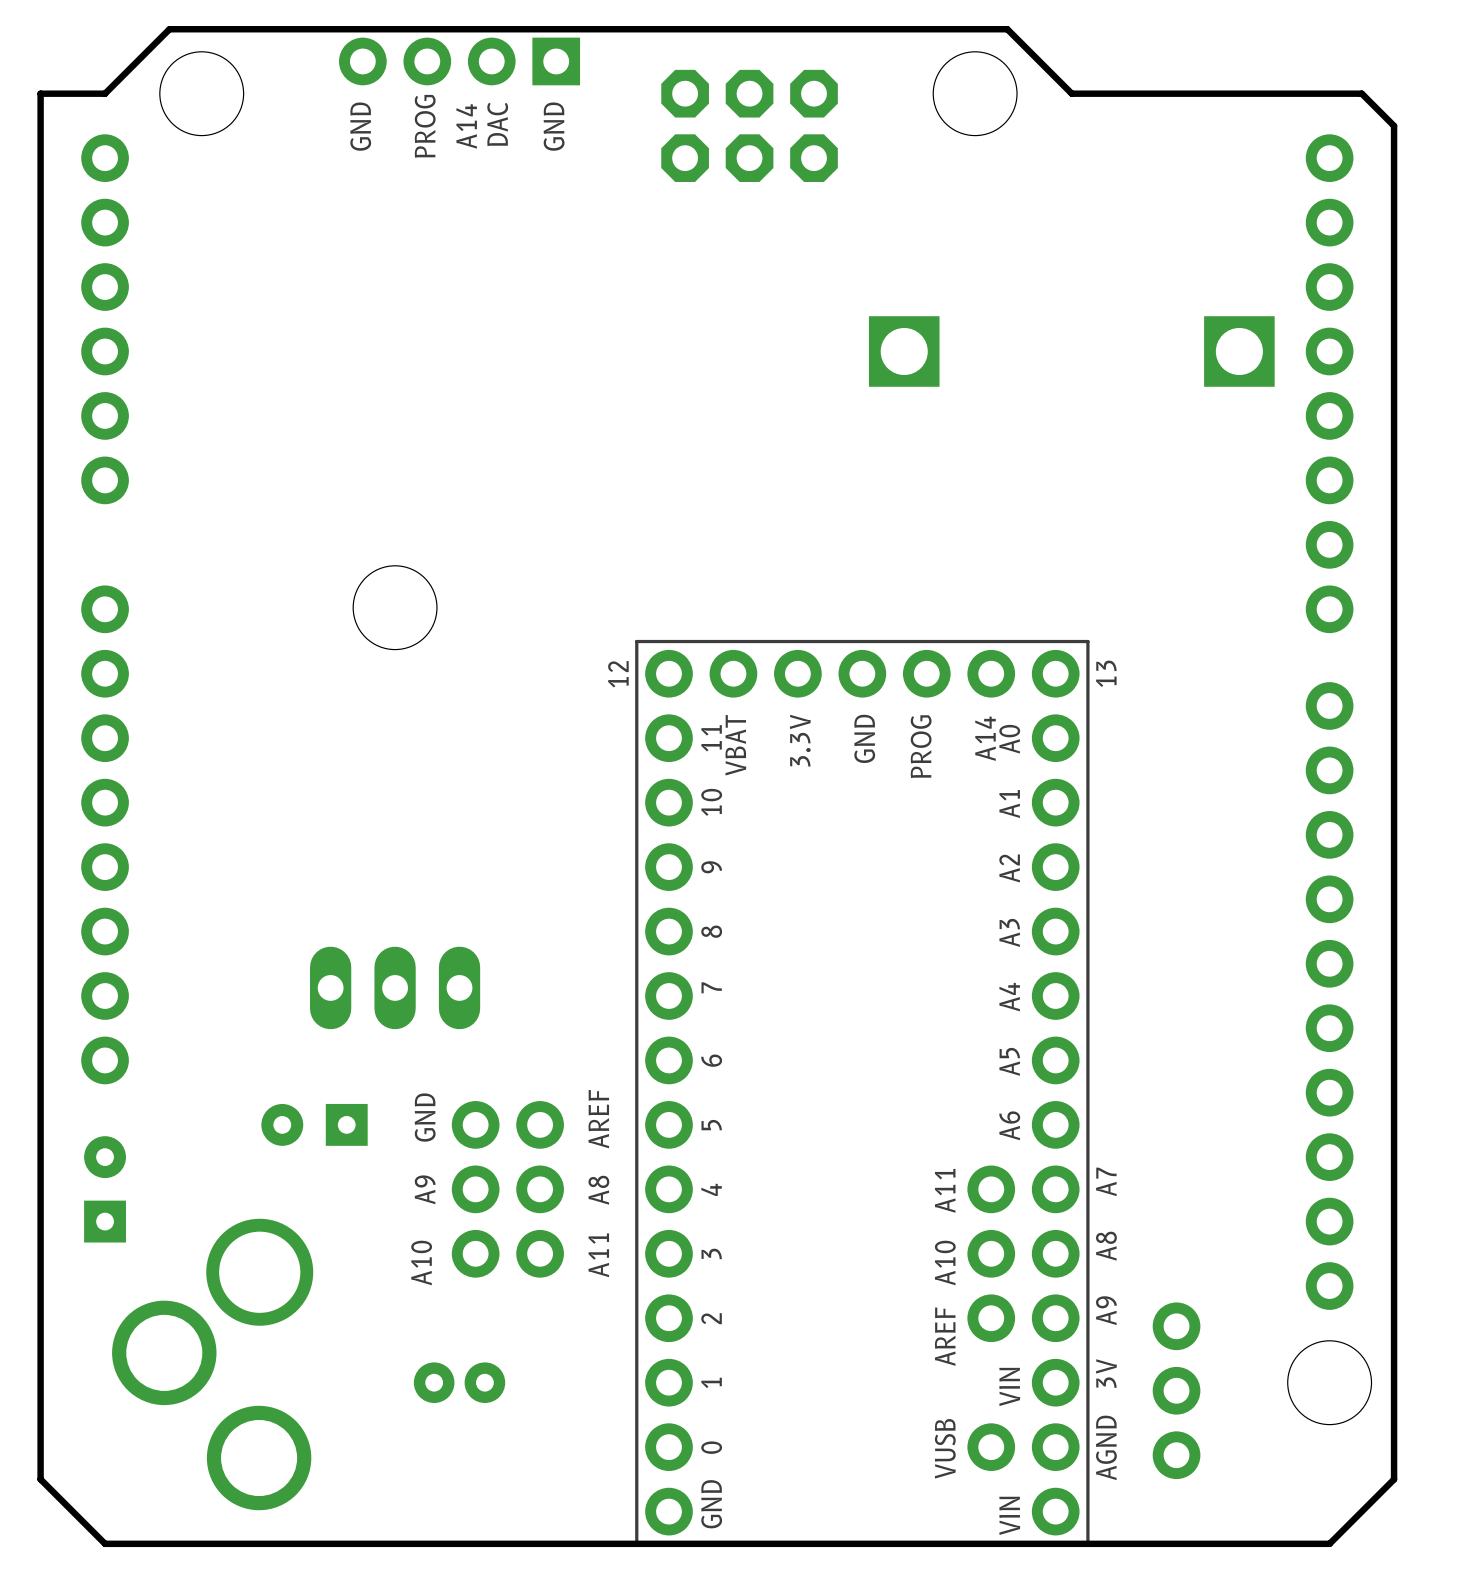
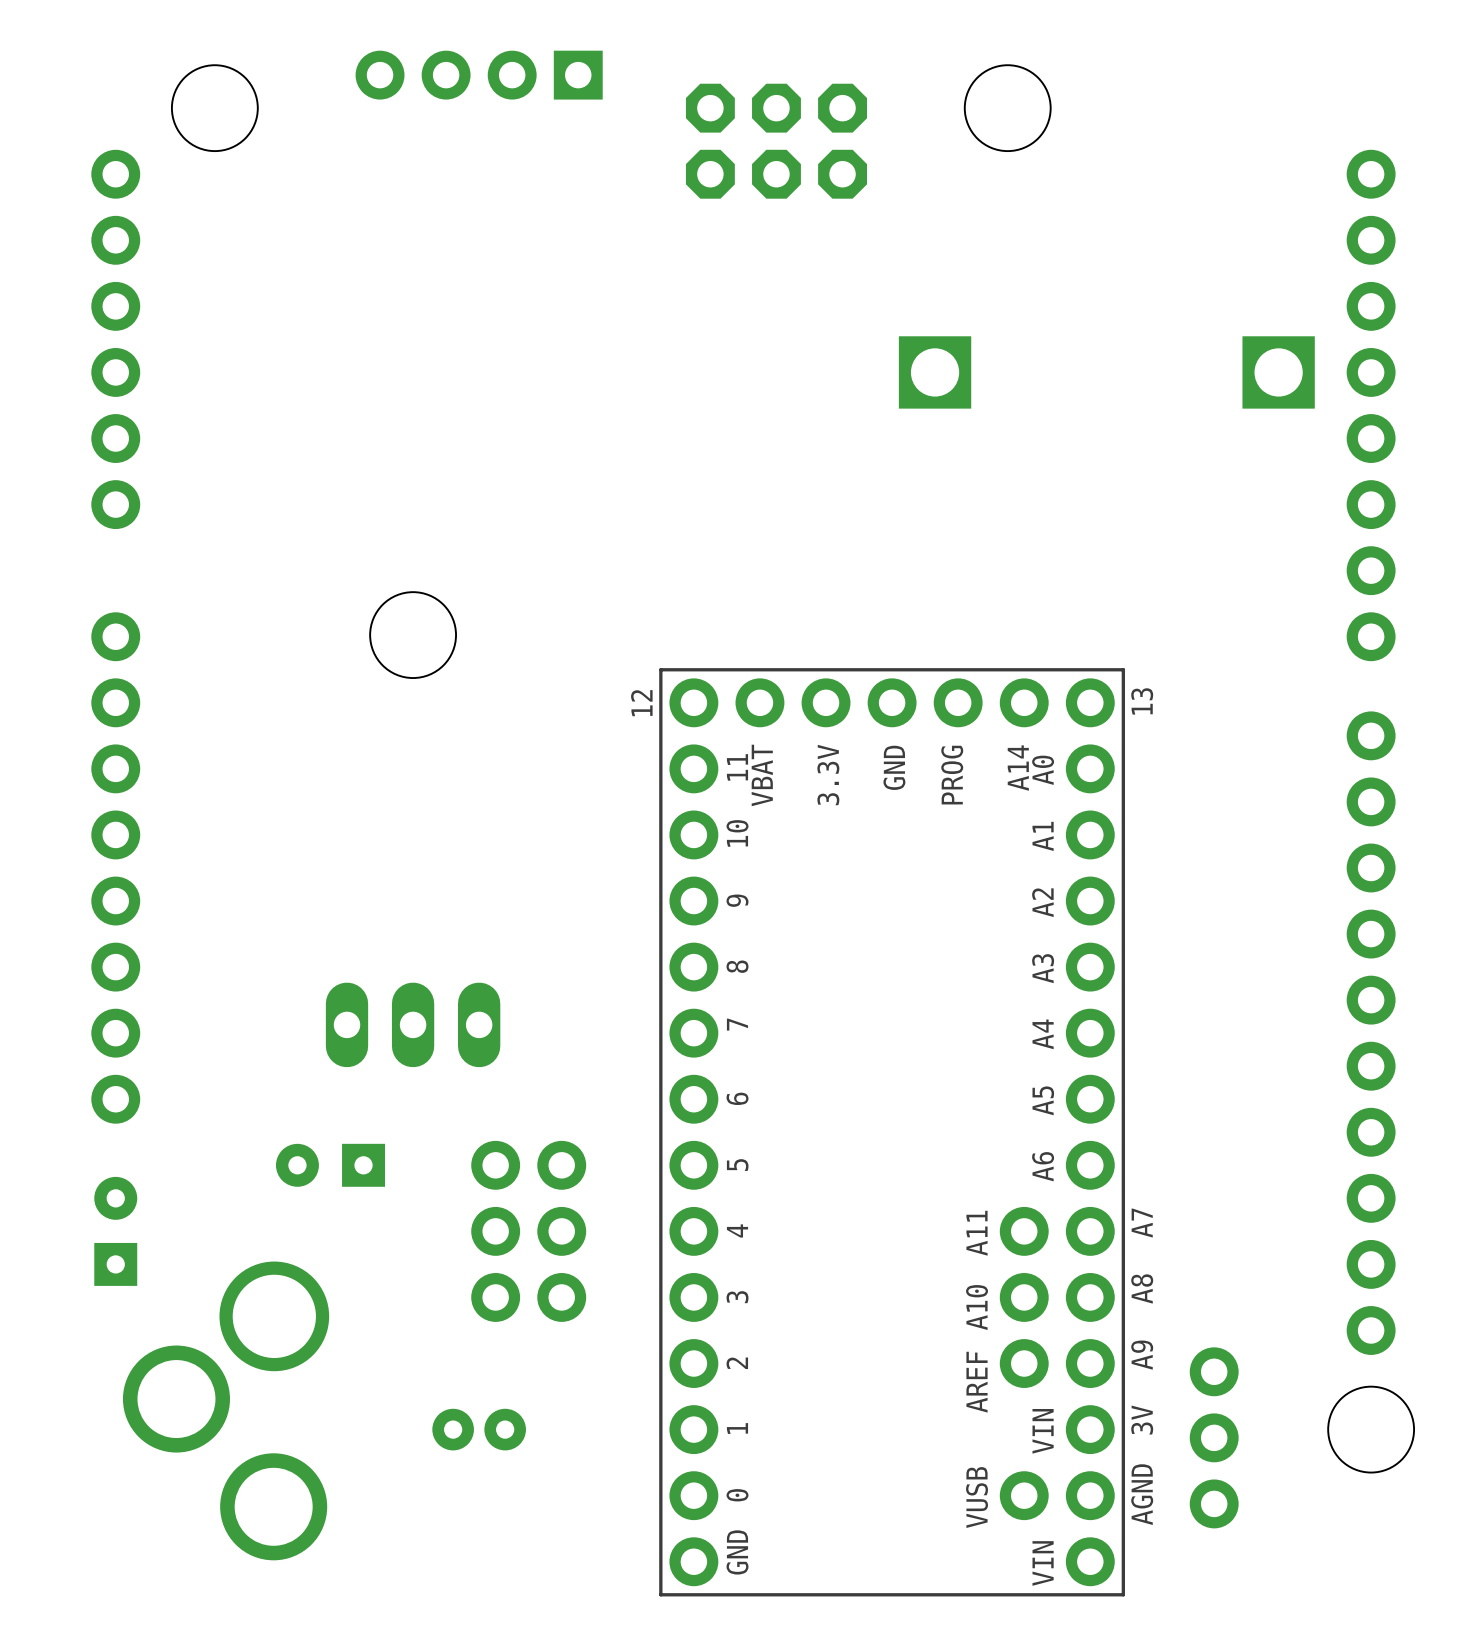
board edge: (1007, 29) (169, 29) (105, 93) (40, 93) (40, 1479) (105, 1543) (1329, 1543) (1394, 1479) (1394, 125) (1361, 93) (1071, 93) (1007, 29) -> none
text: DAC (497, 124) -> none
text: GND (360, 126) -> none
text: PROG (425, 126) -> none
text: A14 (466, 126) -> none
text: GND (554, 126) -> none
text: GND (425, 1117) -> none
text: AREF (598, 1119) -> none
text: A9 (425, 1189) -> none
text: A8 (598, 1190) -> none
text: A11 (598, 1255) -> none
text: A10 (421, 1263) -> none

